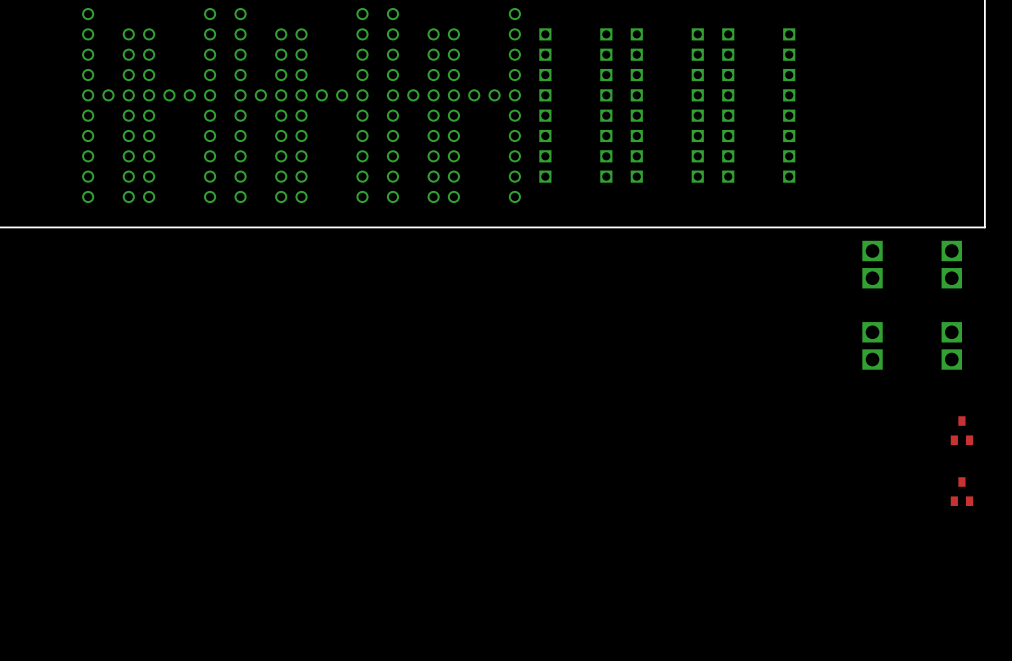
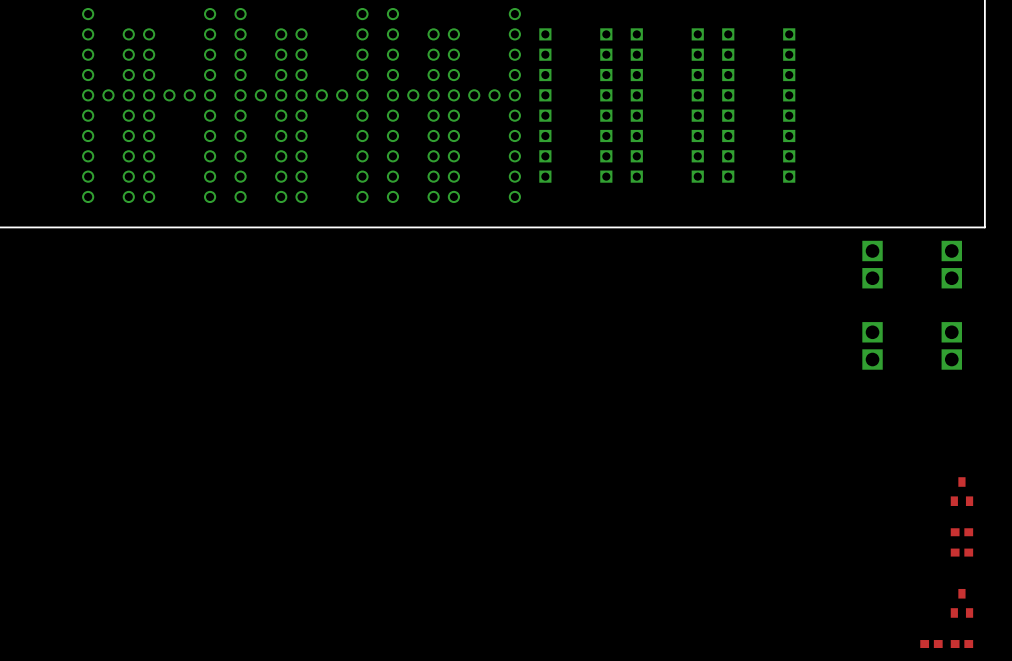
part position: (961, 430) -> (961, 603)
part: none -> (961, 532)
part: none -> (961, 552)
part: none -> (931, 644)
part: none -> (961, 644)

